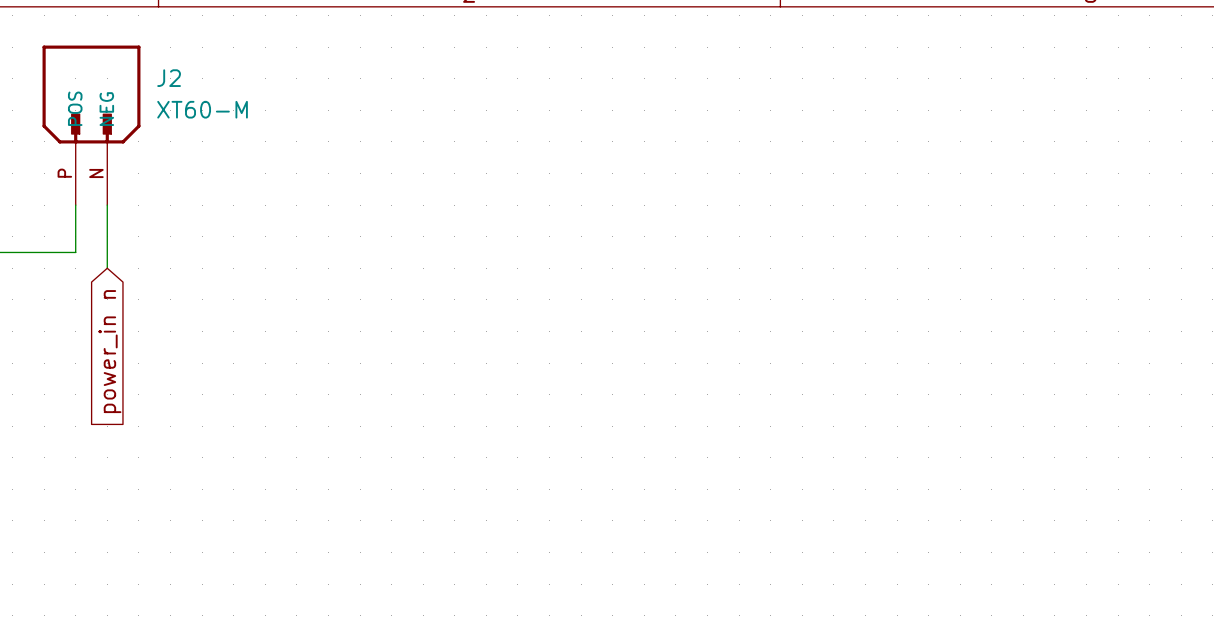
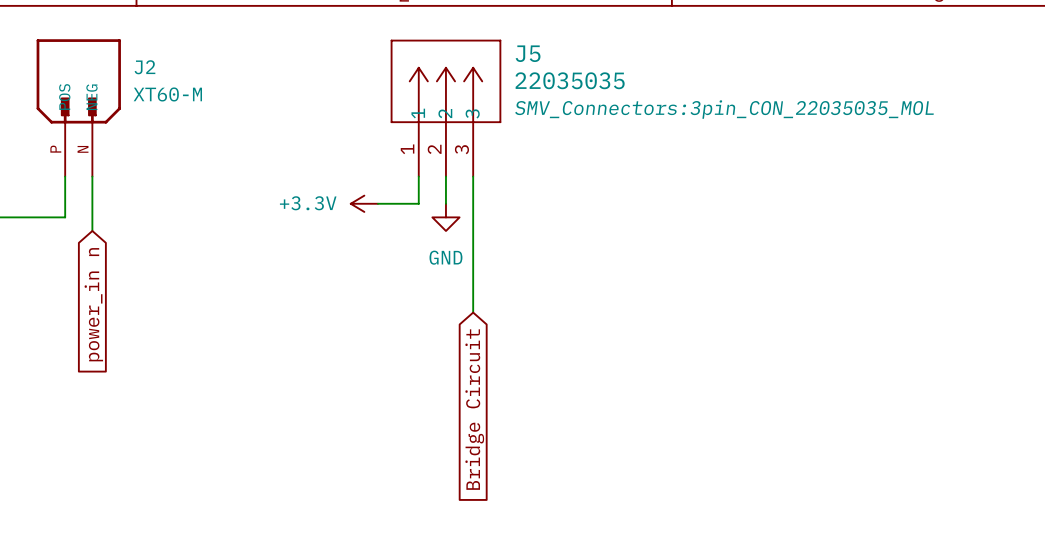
J5: none -> 22035035 (445, 108)
wire: none -> (418, 176) (418, 203) (377, 203)
wire: none -> (445, 176) (445, 203)
wire: none -> (473, 176) (473, 312)
power symbol: none -> +3.3V (364, 203)
power symbol: none -> GND (445, 217)
global label: none -> Bridge Circuit (474, 409)

